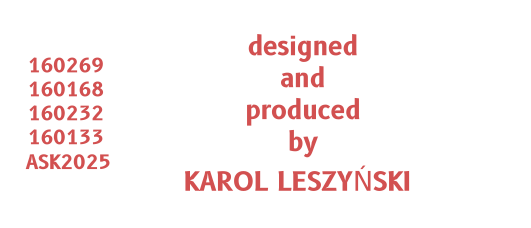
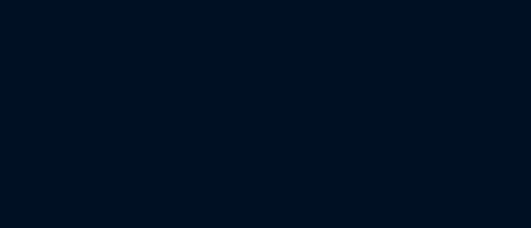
text: designed (302, 47) -> none
text: 160269 (66, 65) -> none
text: and (302, 76) -> none
text: 160168 (66, 88) -> none
text: produced (303, 111) -> none
text: 160232 (65, 112) -> none
text: 160133 (65, 136) -> none
text: by (303, 143) -> none
text: ASK2025 (67, 161) -> none
text: KAROL LESZYŃSKI (297, 178) -> none

